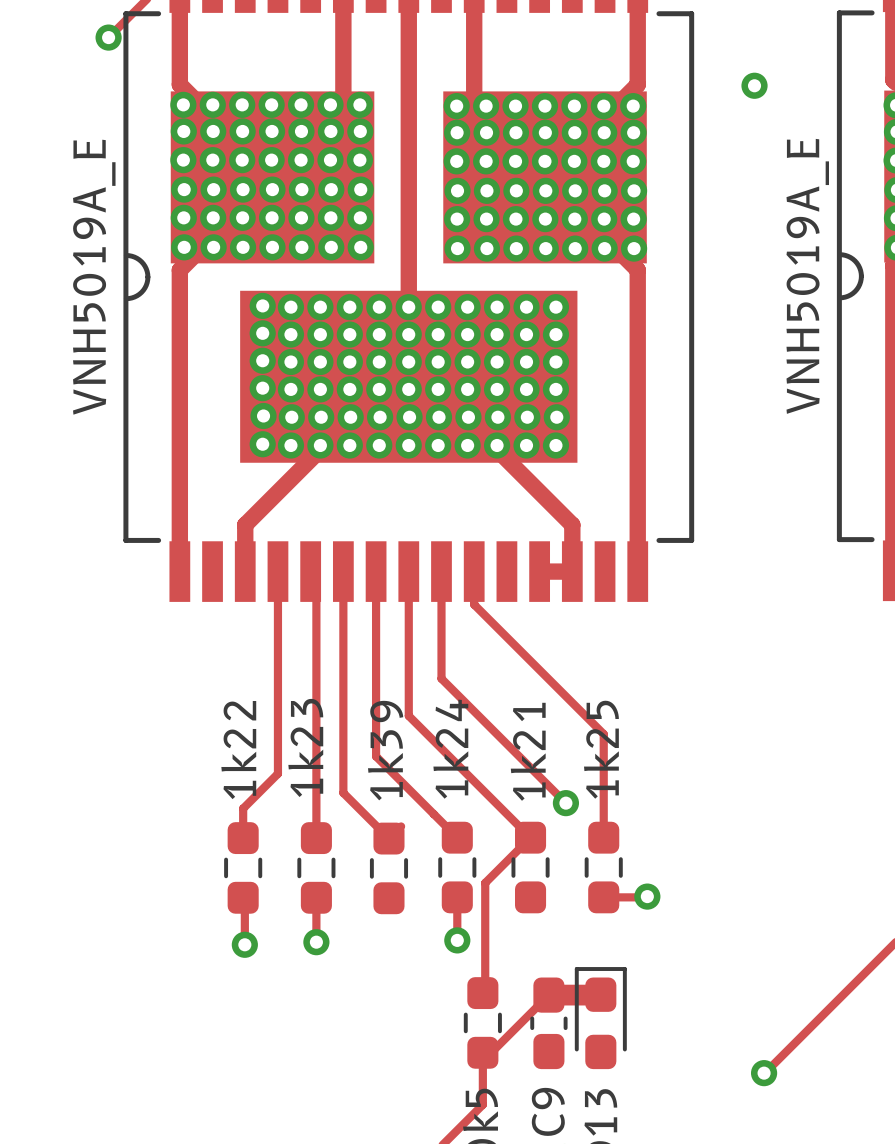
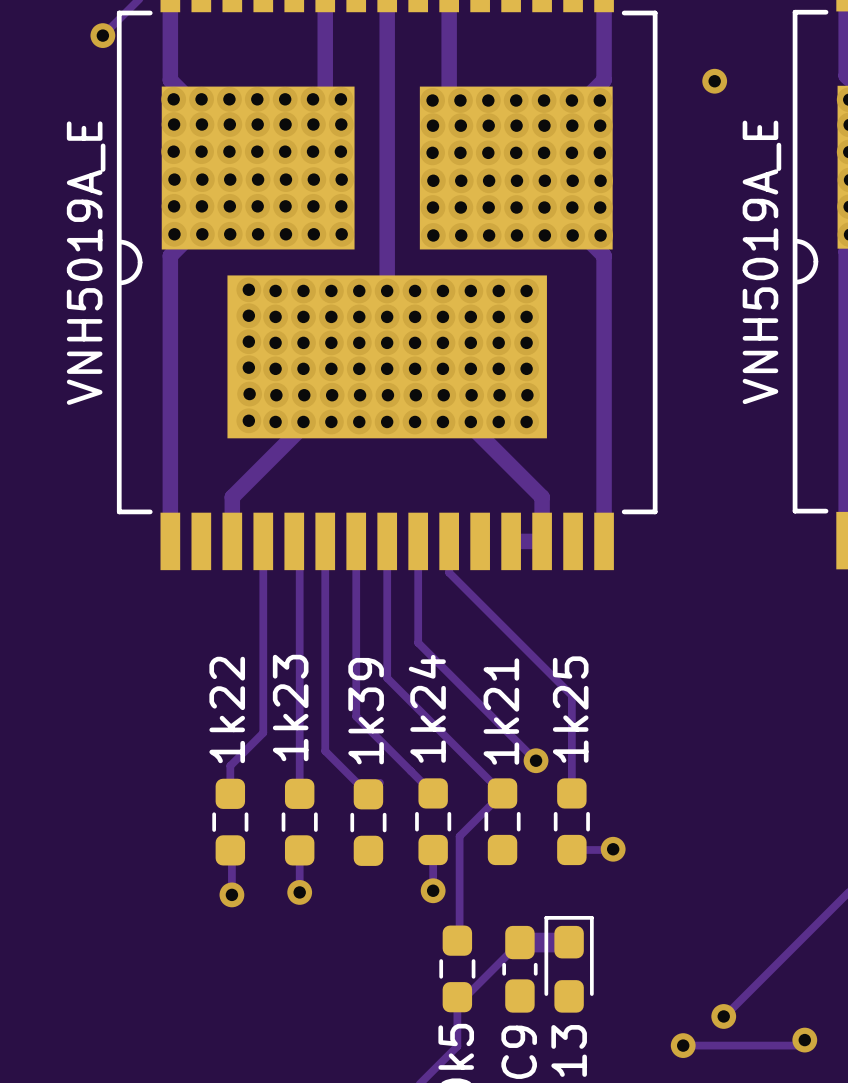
track: none -> (804, 1040) (799, 1045) (683, 1045)
via: none -> (804, 1040)
via: none -> (683, 1045)

